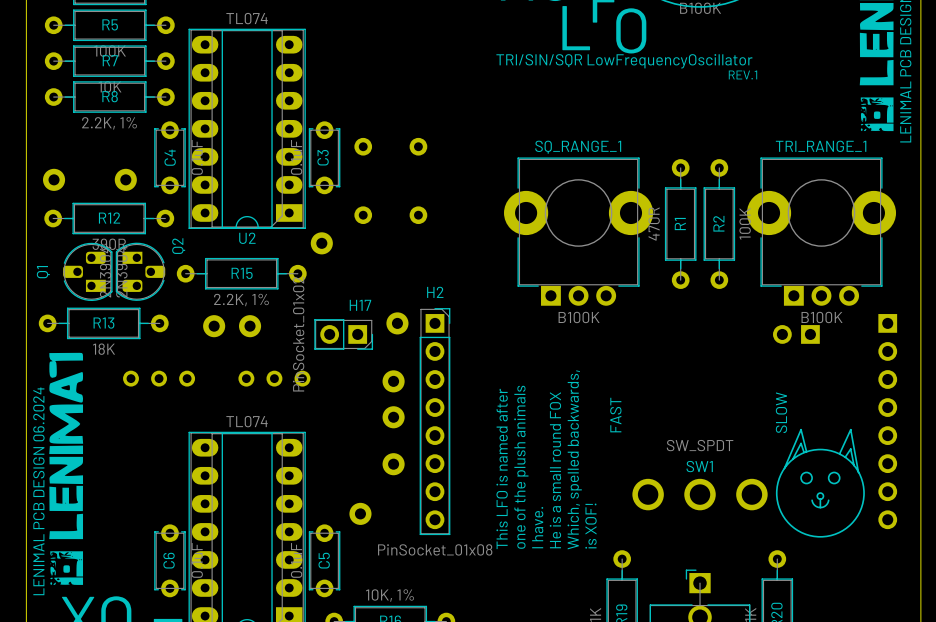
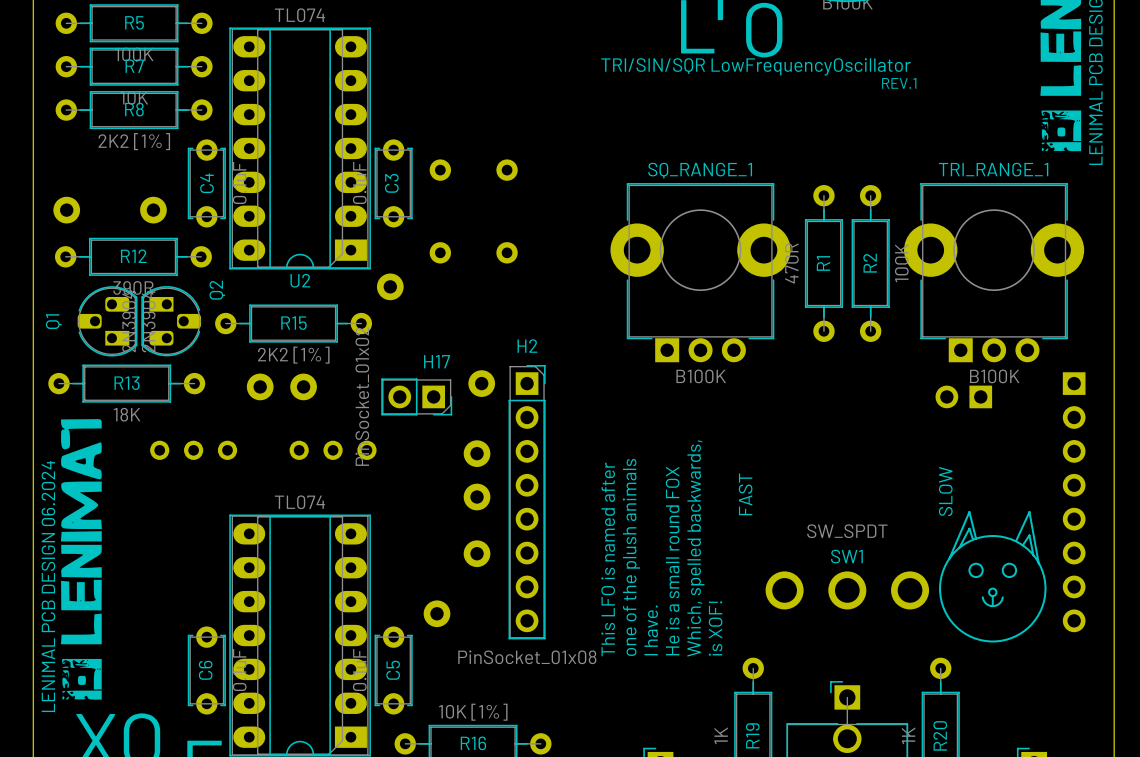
R8 value: 2.2K, 1% (109, 123) -> 2K2 [1%] (134, 141)
R15 value: 2.2K, 1% (241, 300) -> 2K2 [1%] (293, 355)
R16 value: 10K, 1% (390, 595) -> 10K [1%] (473, 712)

